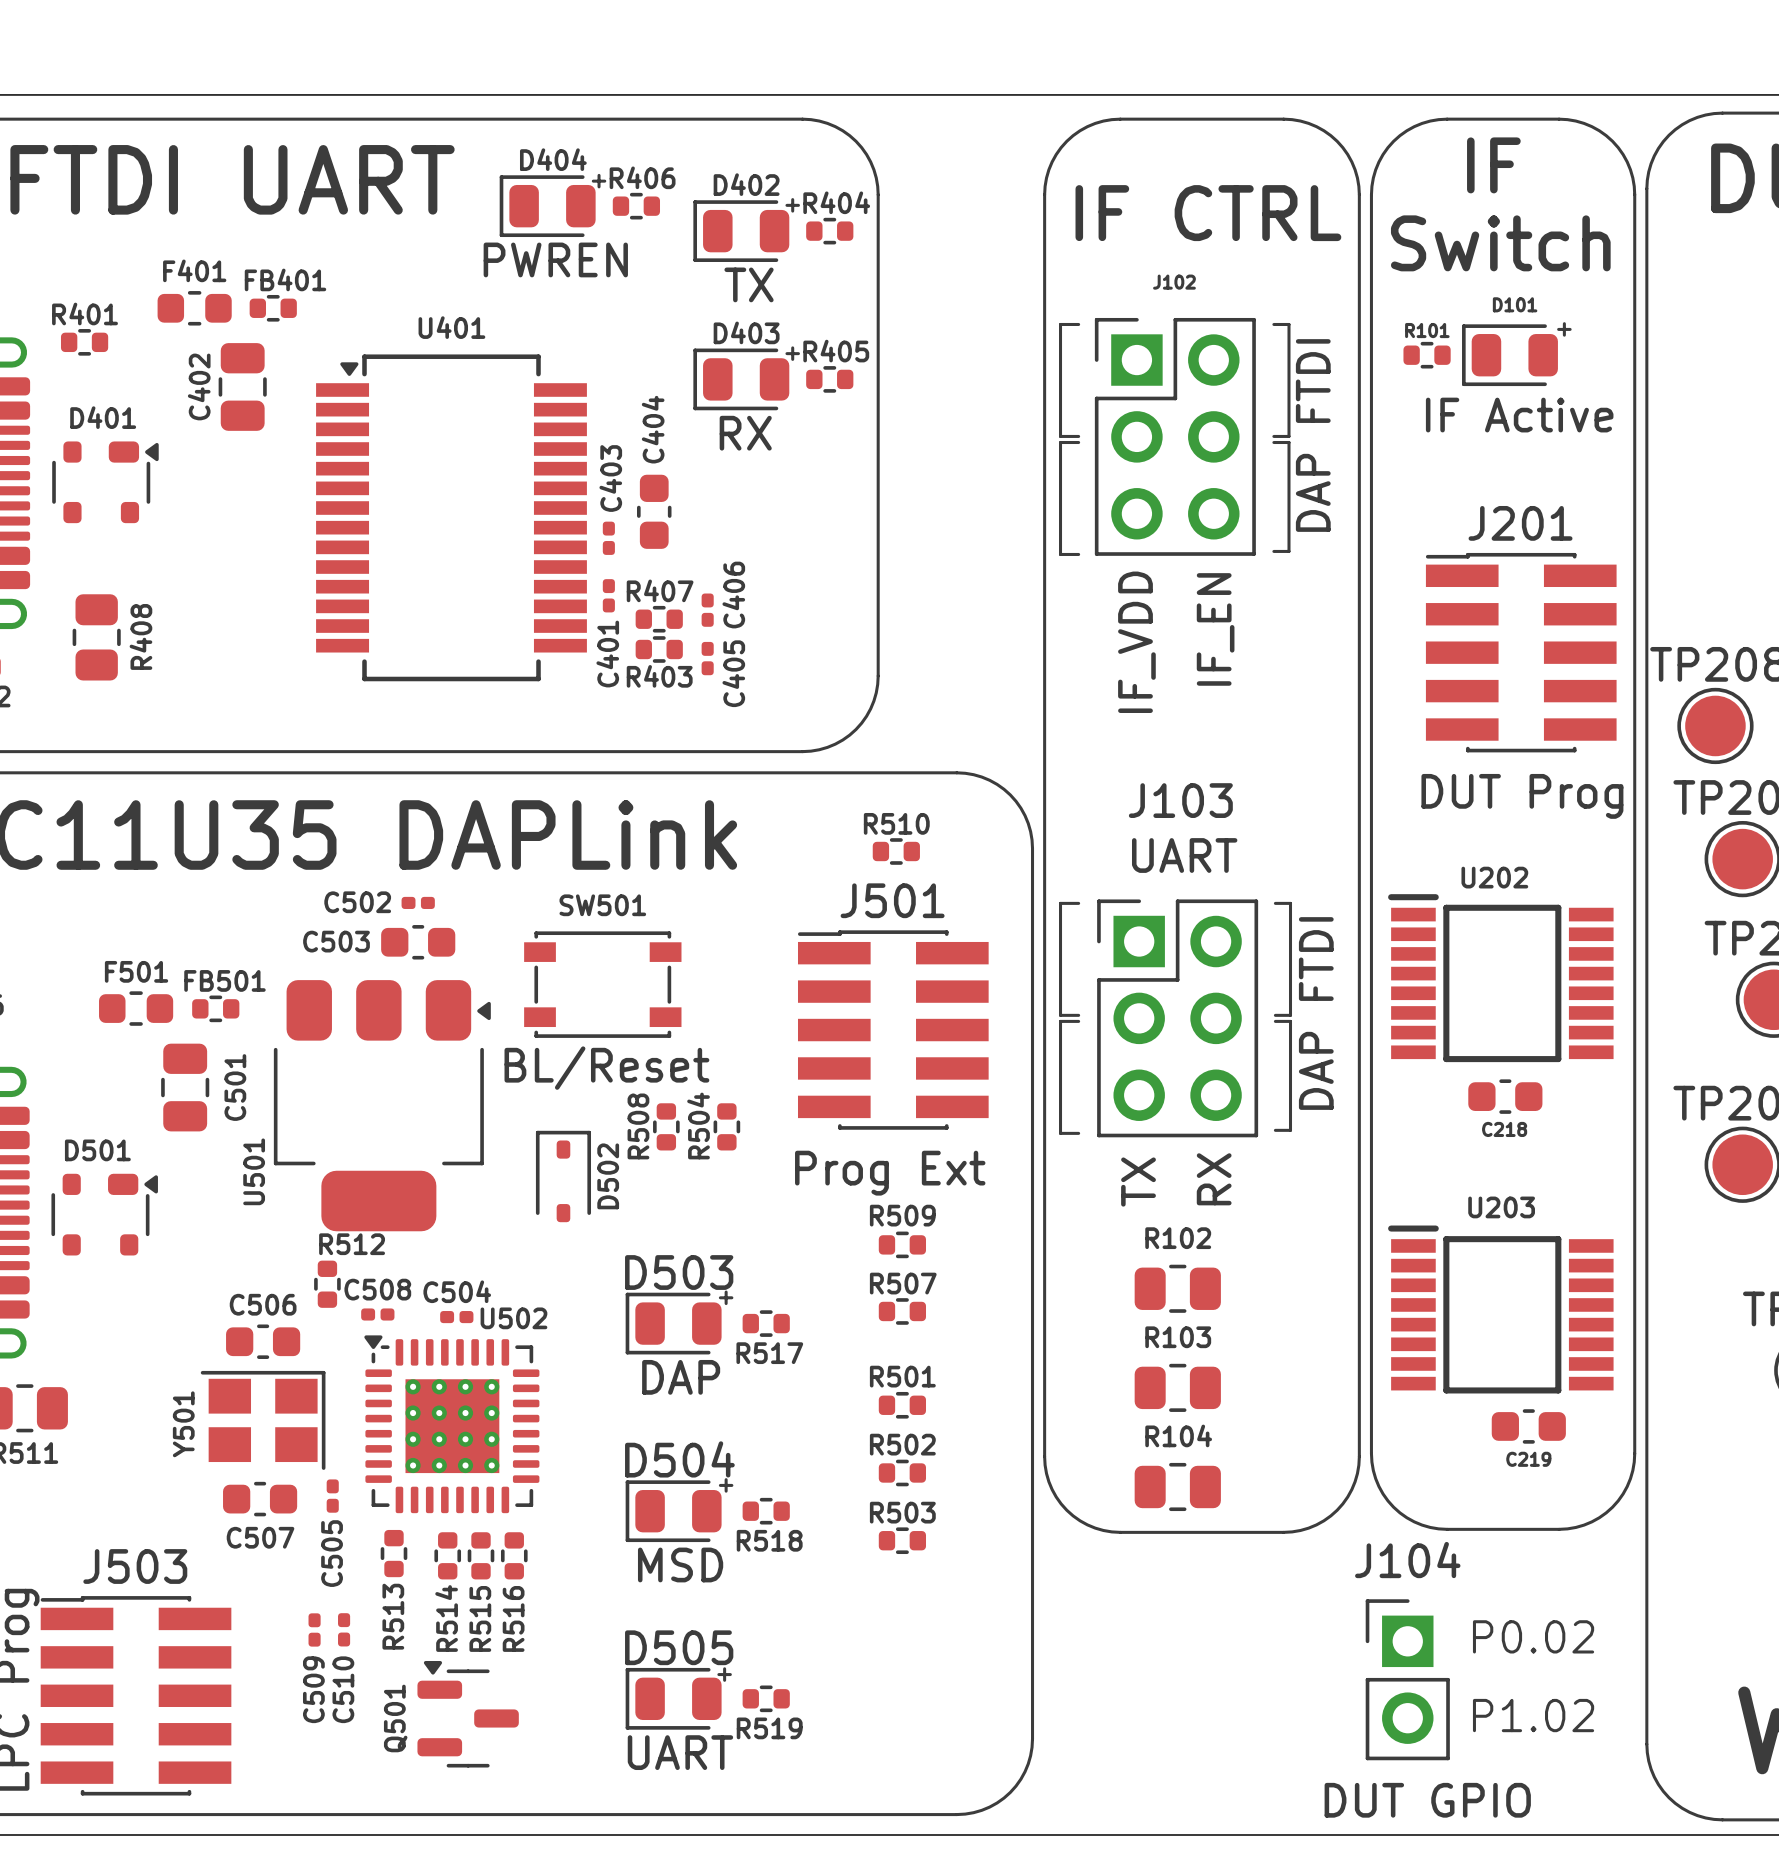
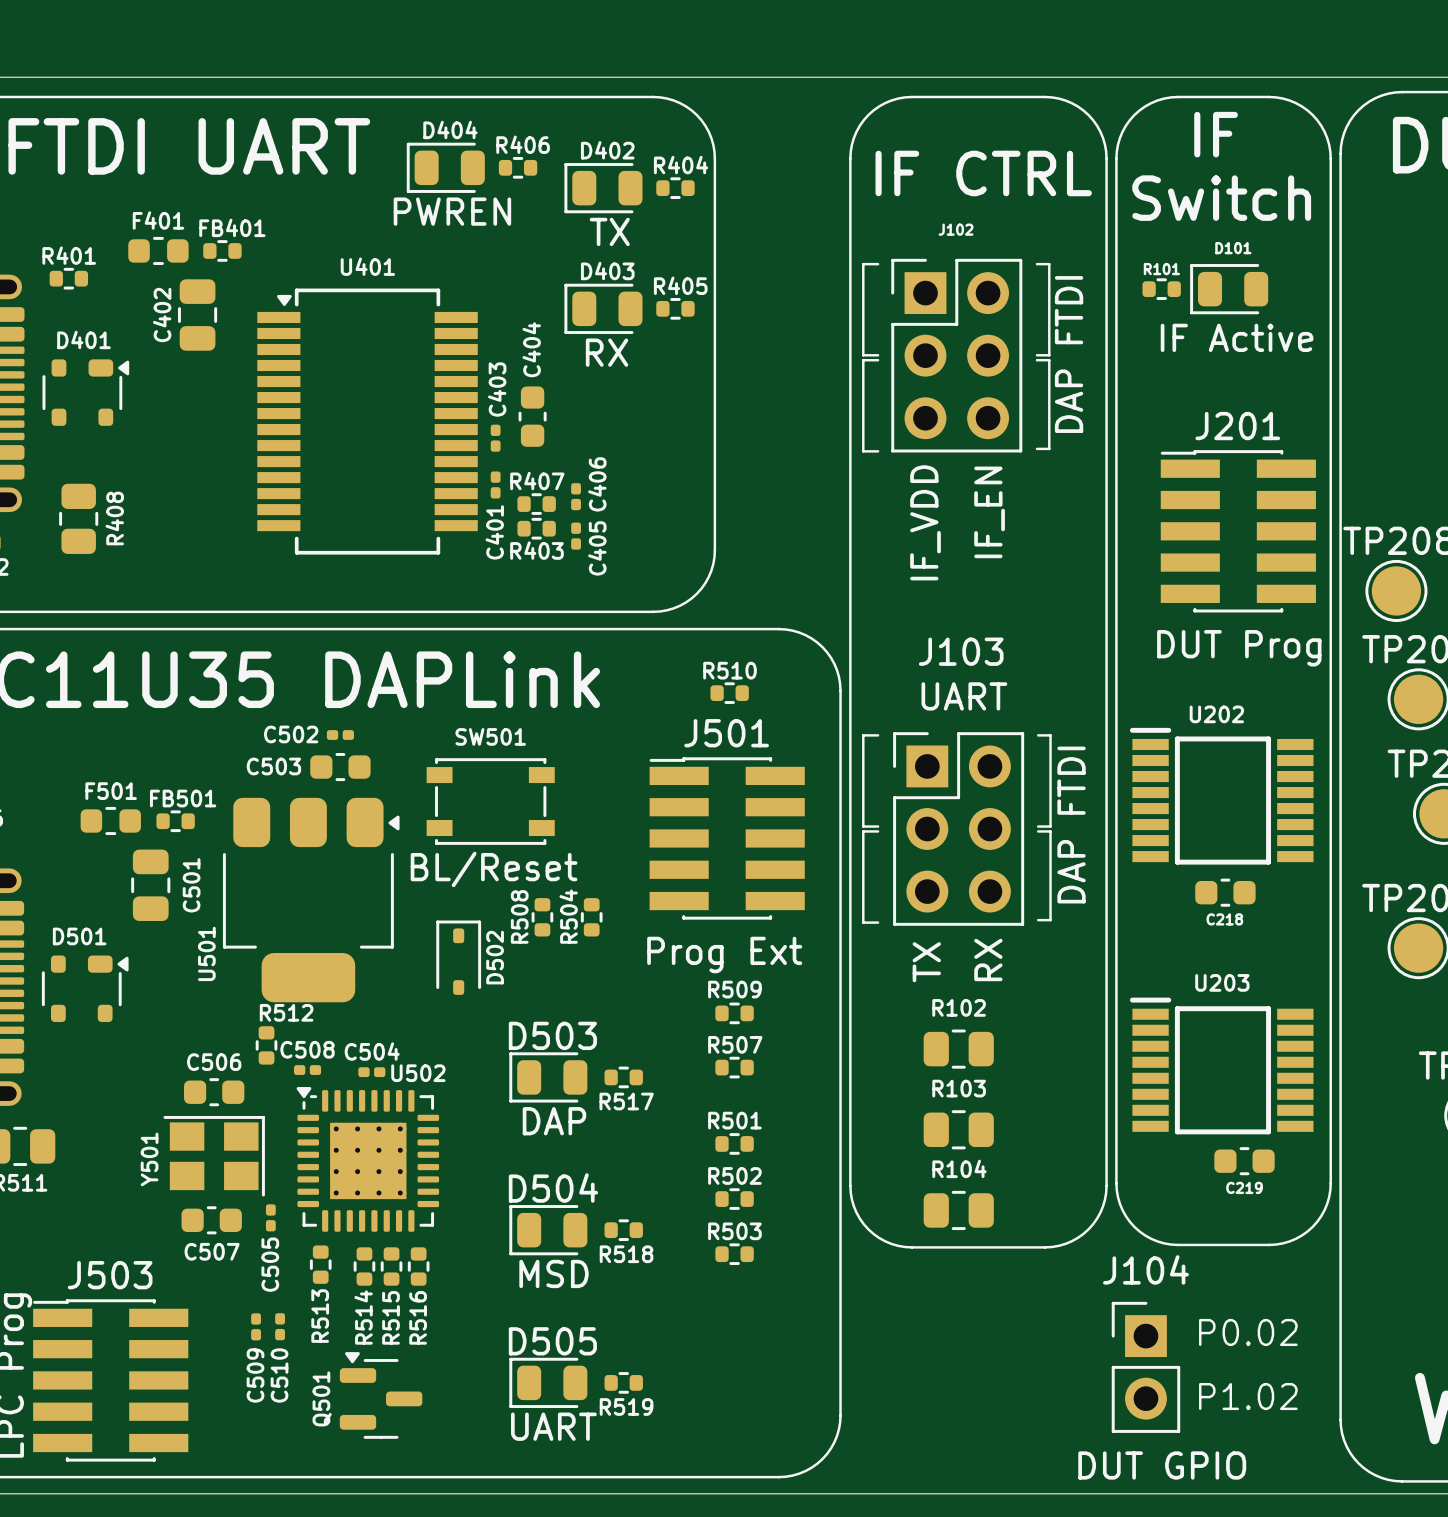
text: + (599, 181) -> none
text: + (792, 205) -> none
text: + (1564, 329) -> none
text: + (792, 353) -> none
text: + (726, 1297) -> none
text: + (726, 1485) -> none
text: + (724, 1674) -> none

